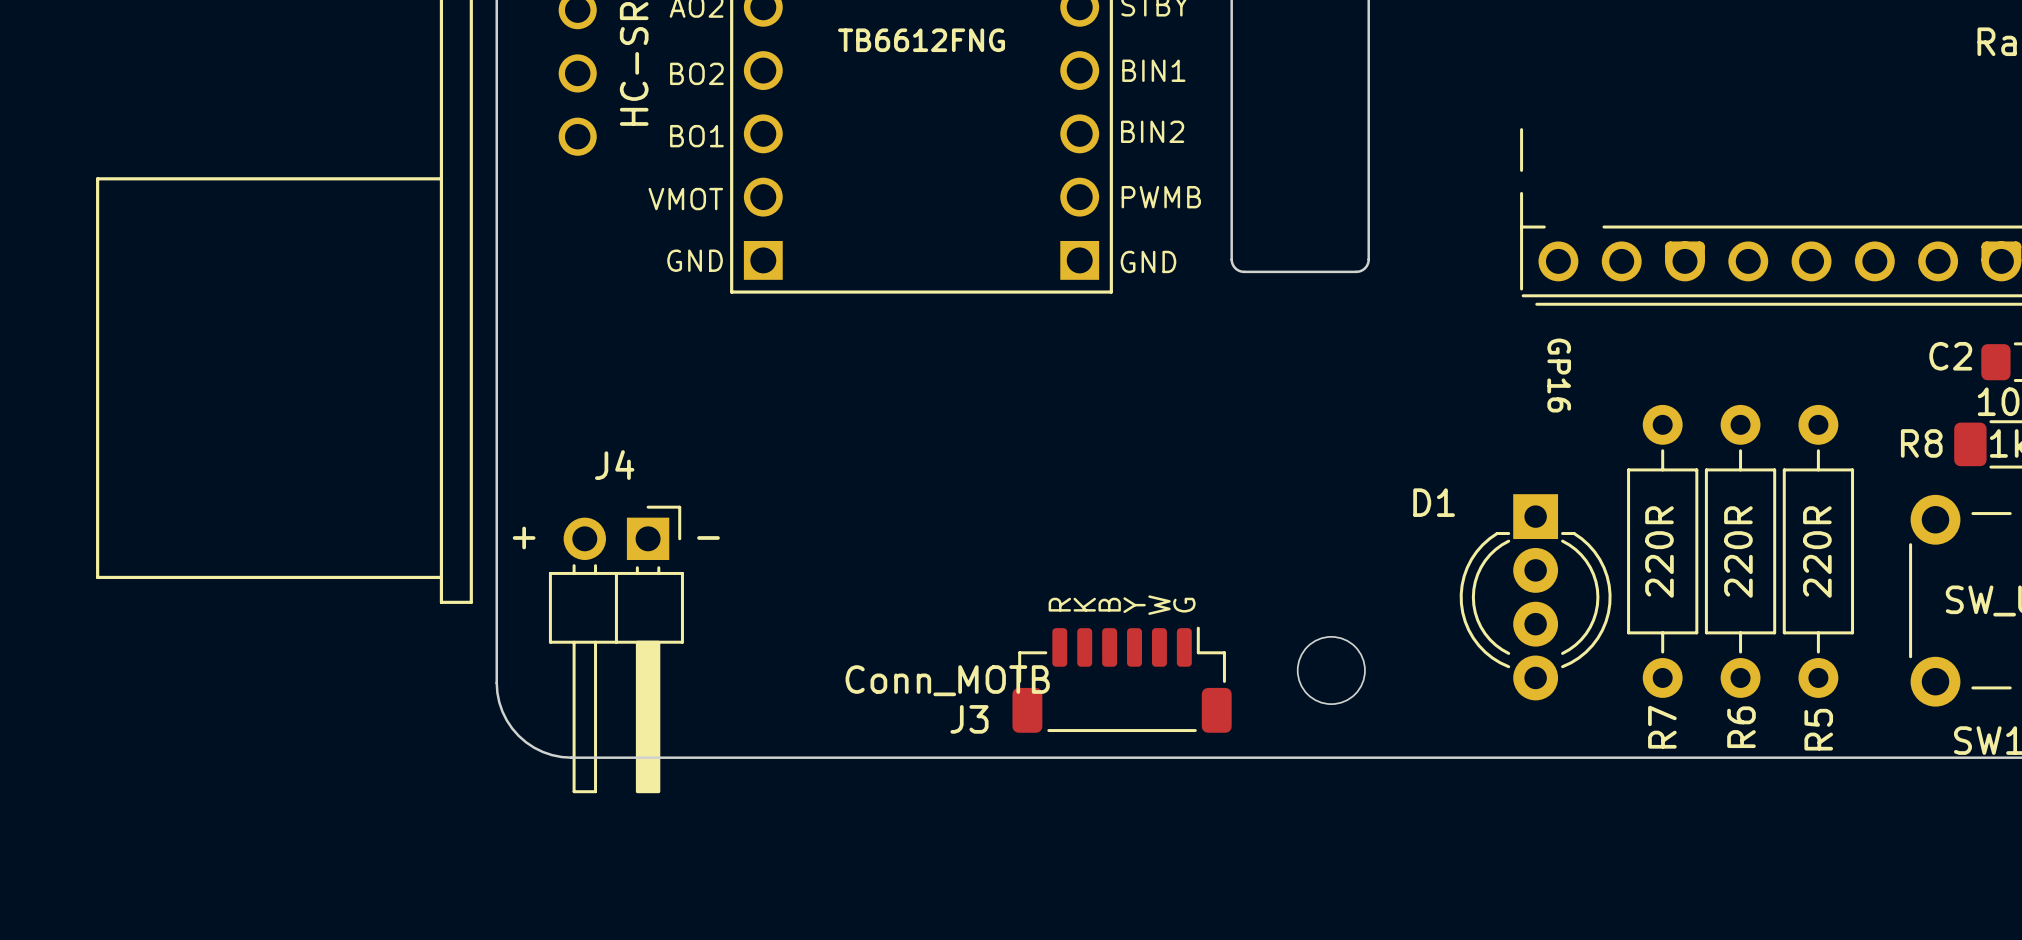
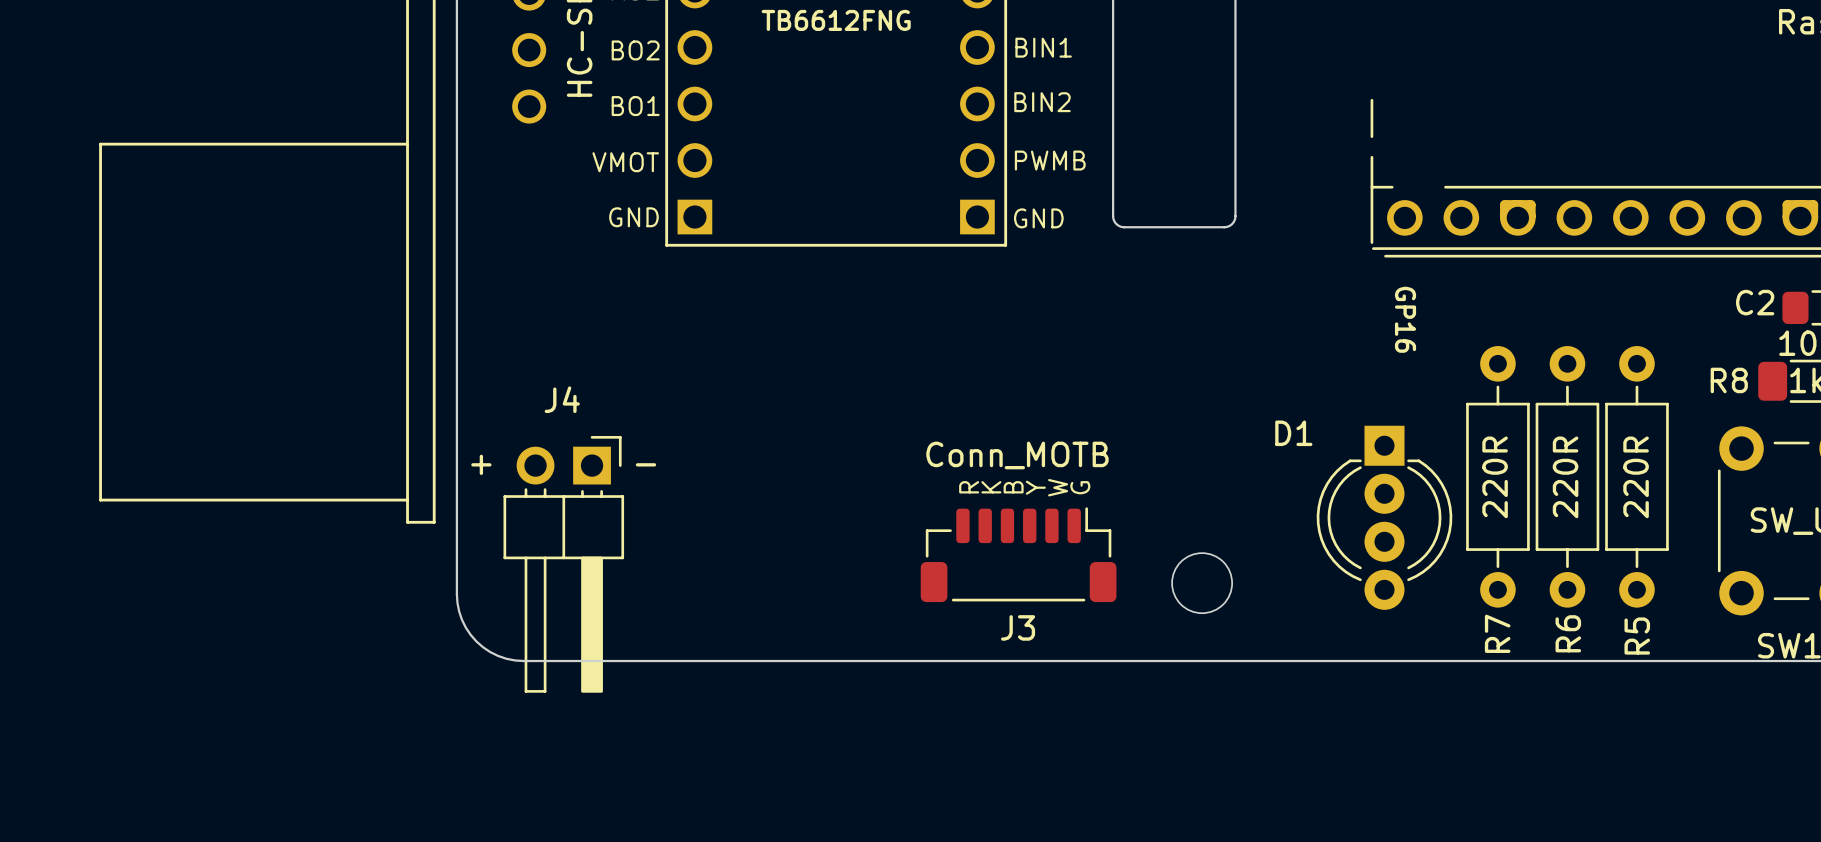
text position: R (1059, 604) -> R (969, 487)
text position: K (1084, 604) -> K (991, 487)
text position: B (1109, 604) -> B (1013, 487)
text position: Y (1134, 605) -> Y (1035, 487)
text position: W (1159, 605) -> W (1058, 487)
text position: G (1184, 605) -> G (1080, 487)
J3 position: (1122, 679) -> (1018, 554)
J3 value position: Conn_MOTB (947, 680) -> Conn_MOTB (1017, 455)
J3 name position: J3 (969, 719) -> J3 (1018, 627)

